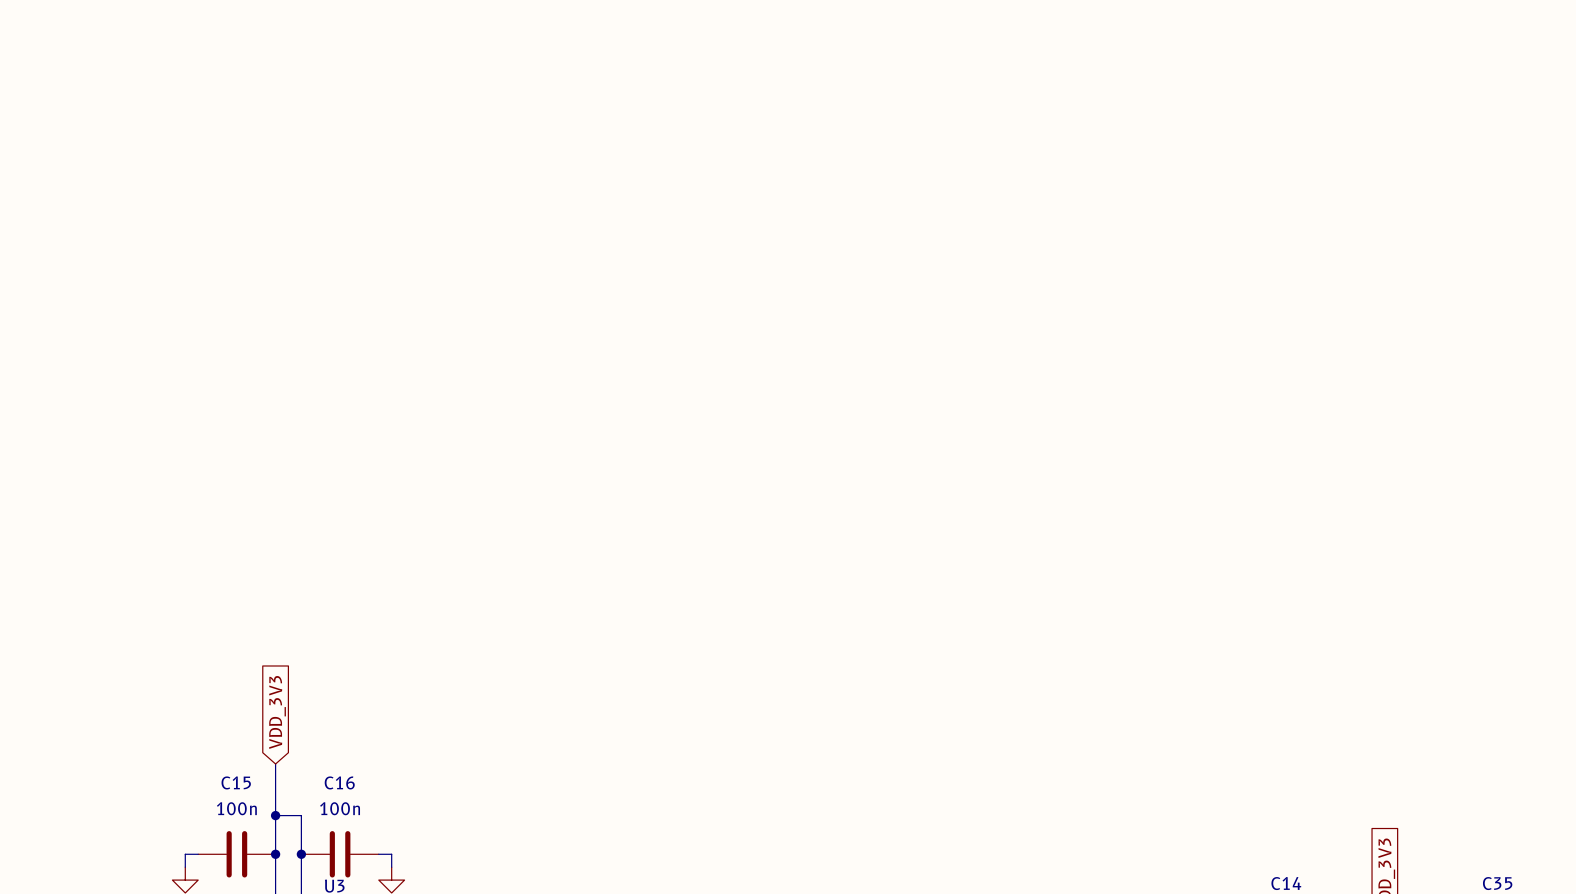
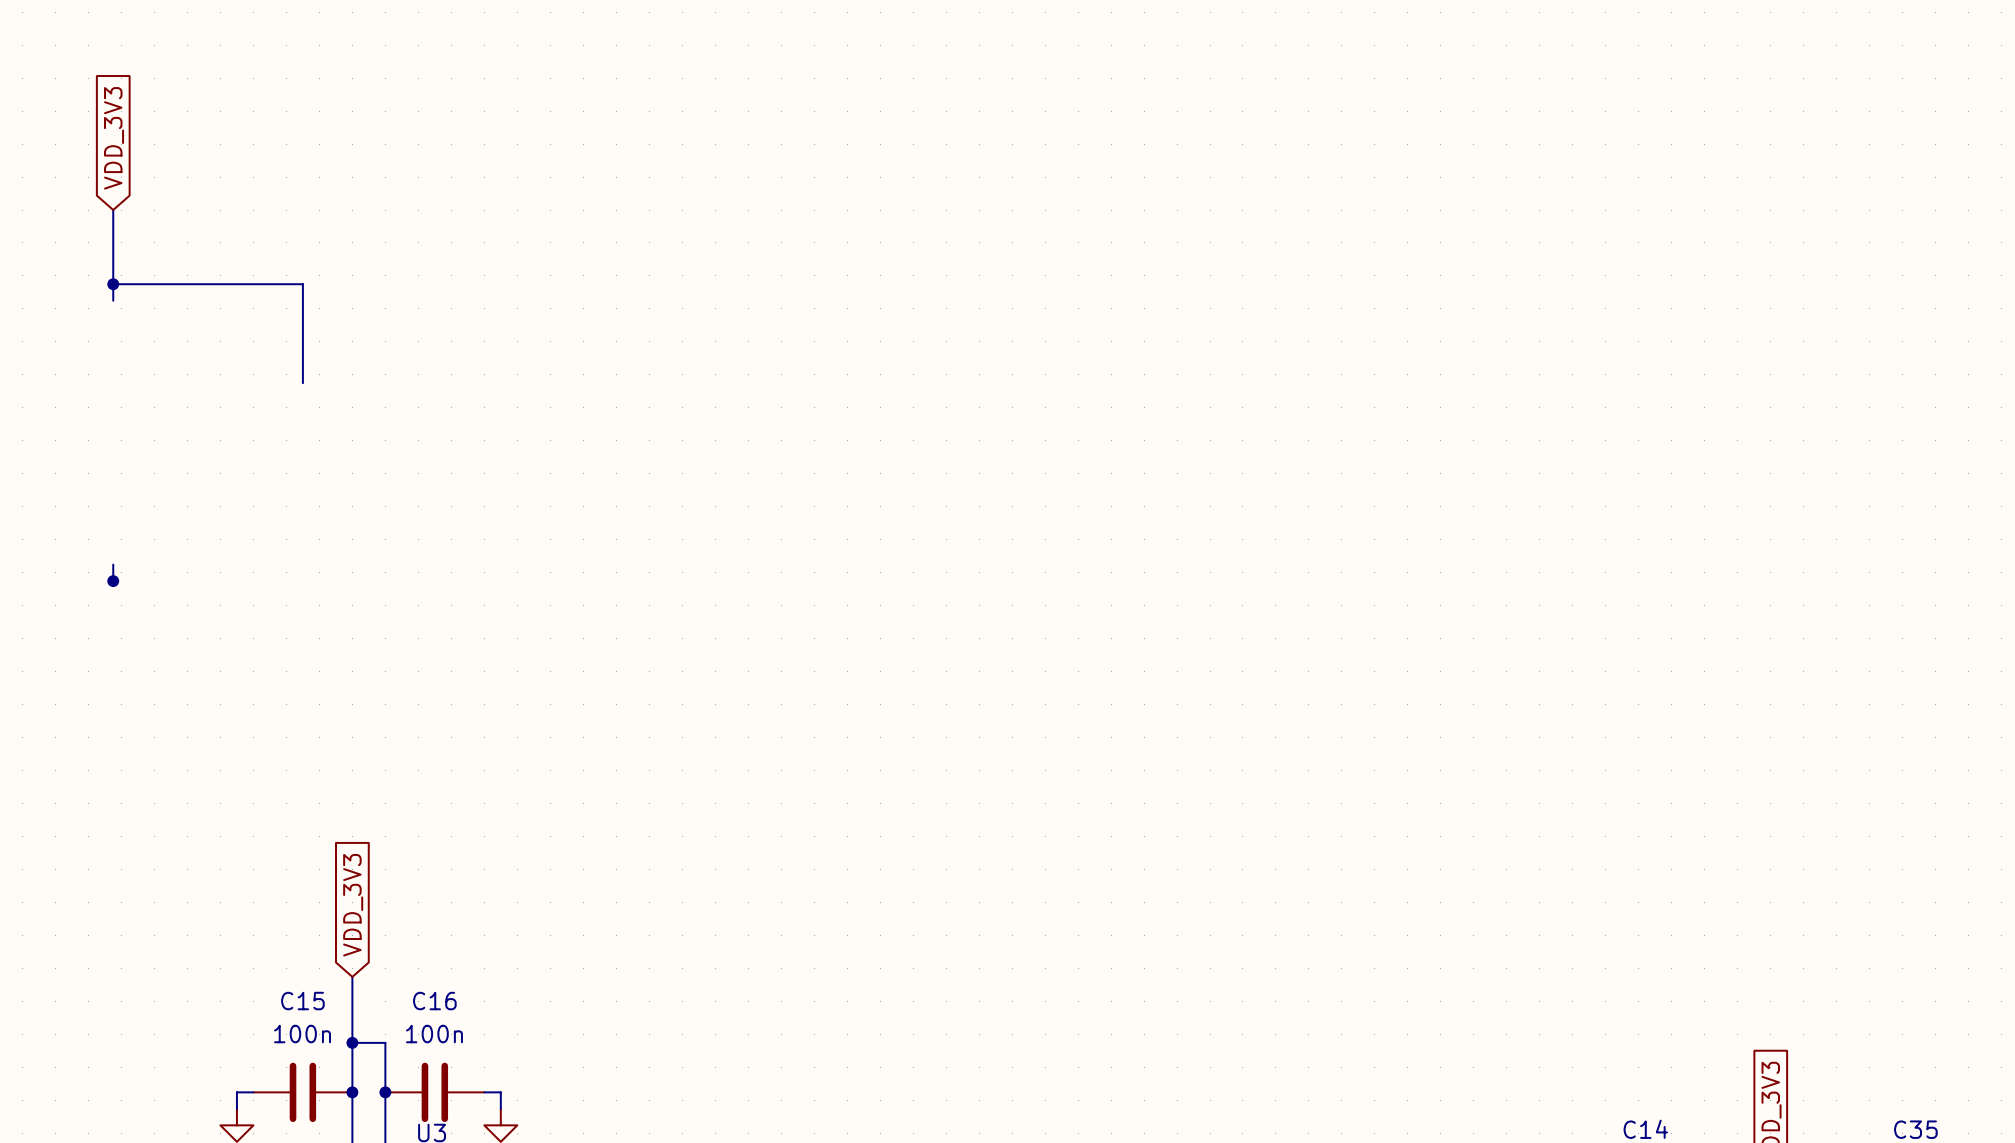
global label: none -> VDD_3V3 (114, 138)
wire: none -> (113, 210) (113, 300)
wire: none -> (113, 284) (302, 284) (302, 383)
junction: none -> (113, 284)
wire: none -> (113, 564) (113, 581)
junction: none -> (113, 581)

